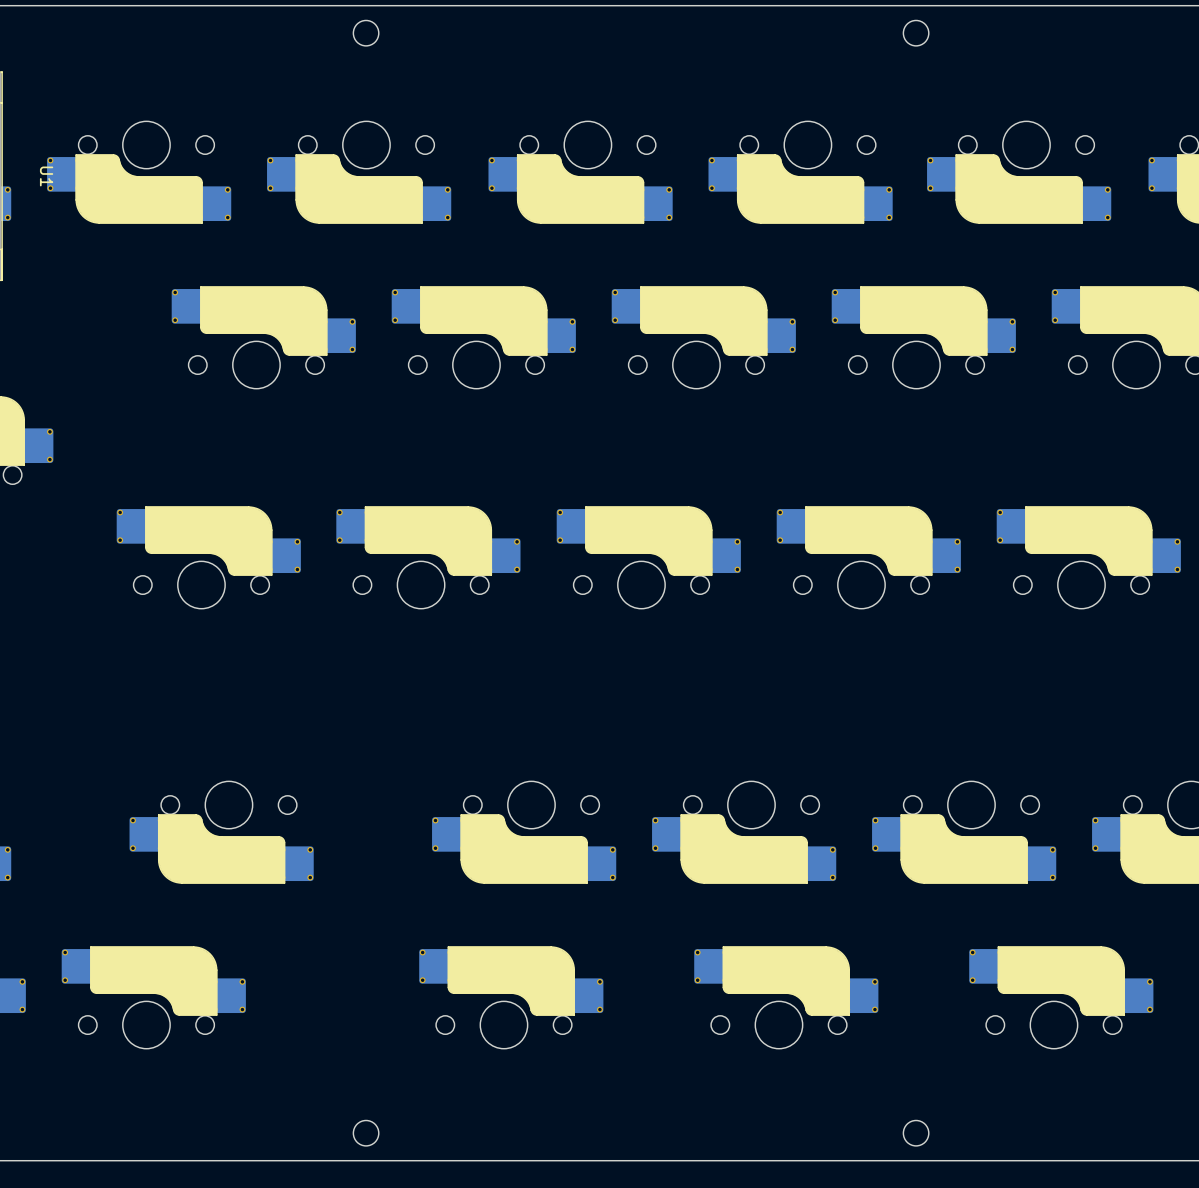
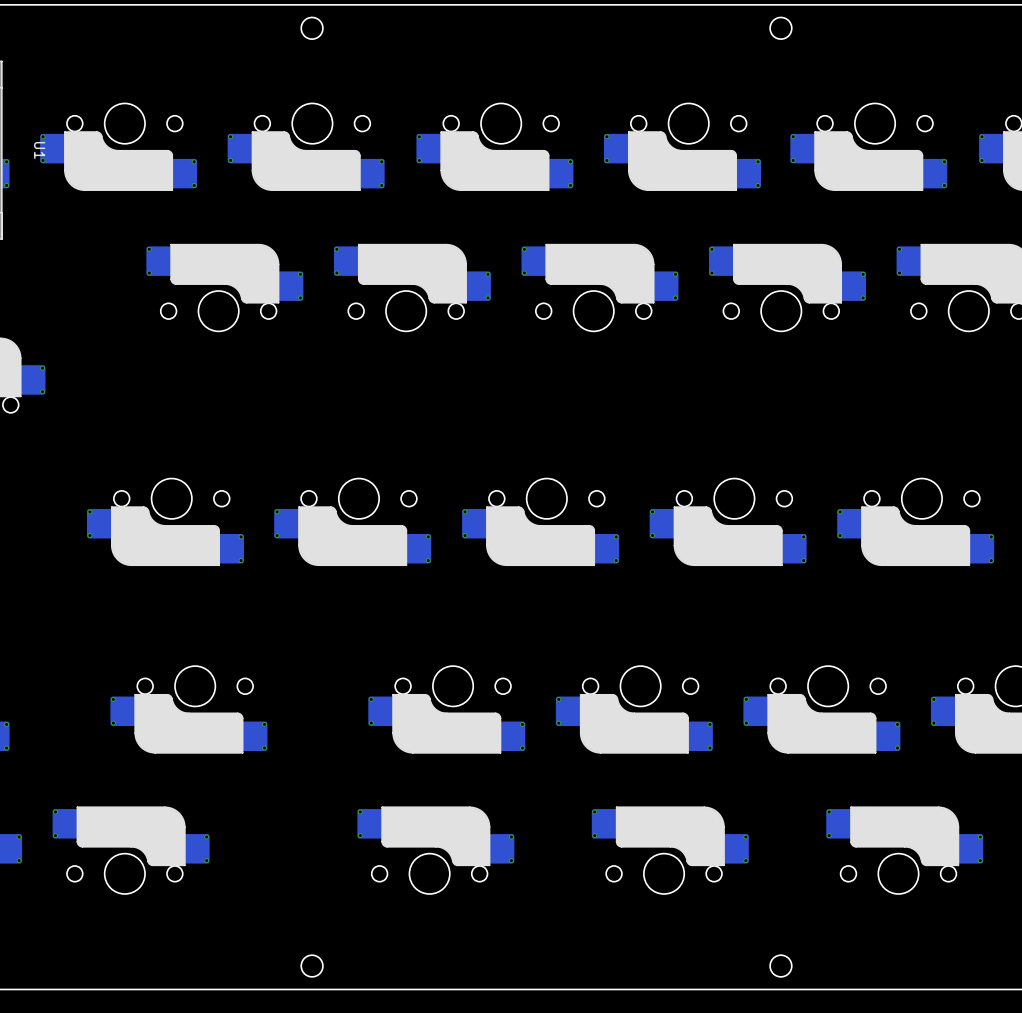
part rotation: 0° (208, 557) -> 180° (165, 522)
part rotation: 0° (428, 557) -> 180° (352, 522)
part rotation: 0° (648, 557) -> 180° (540, 522)
part rotation: 0° (868, 557) -> 180° (728, 522)
part rotation: 0° (1088, 557) -> 180° (915, 522)

